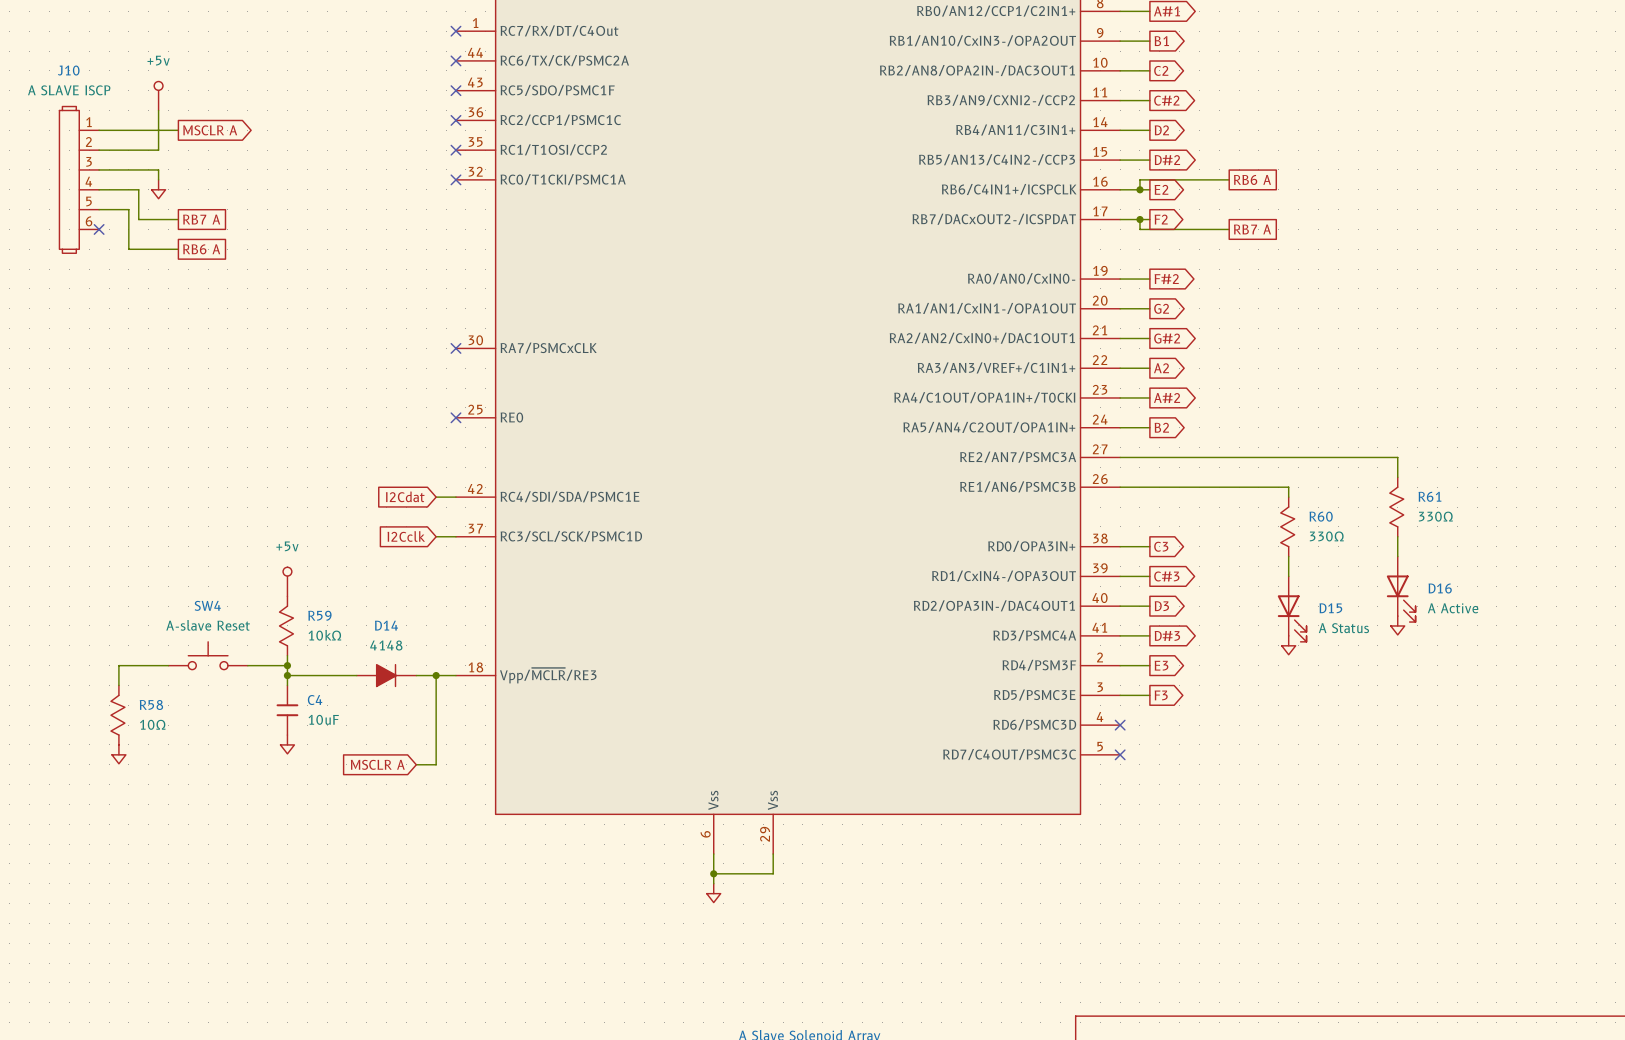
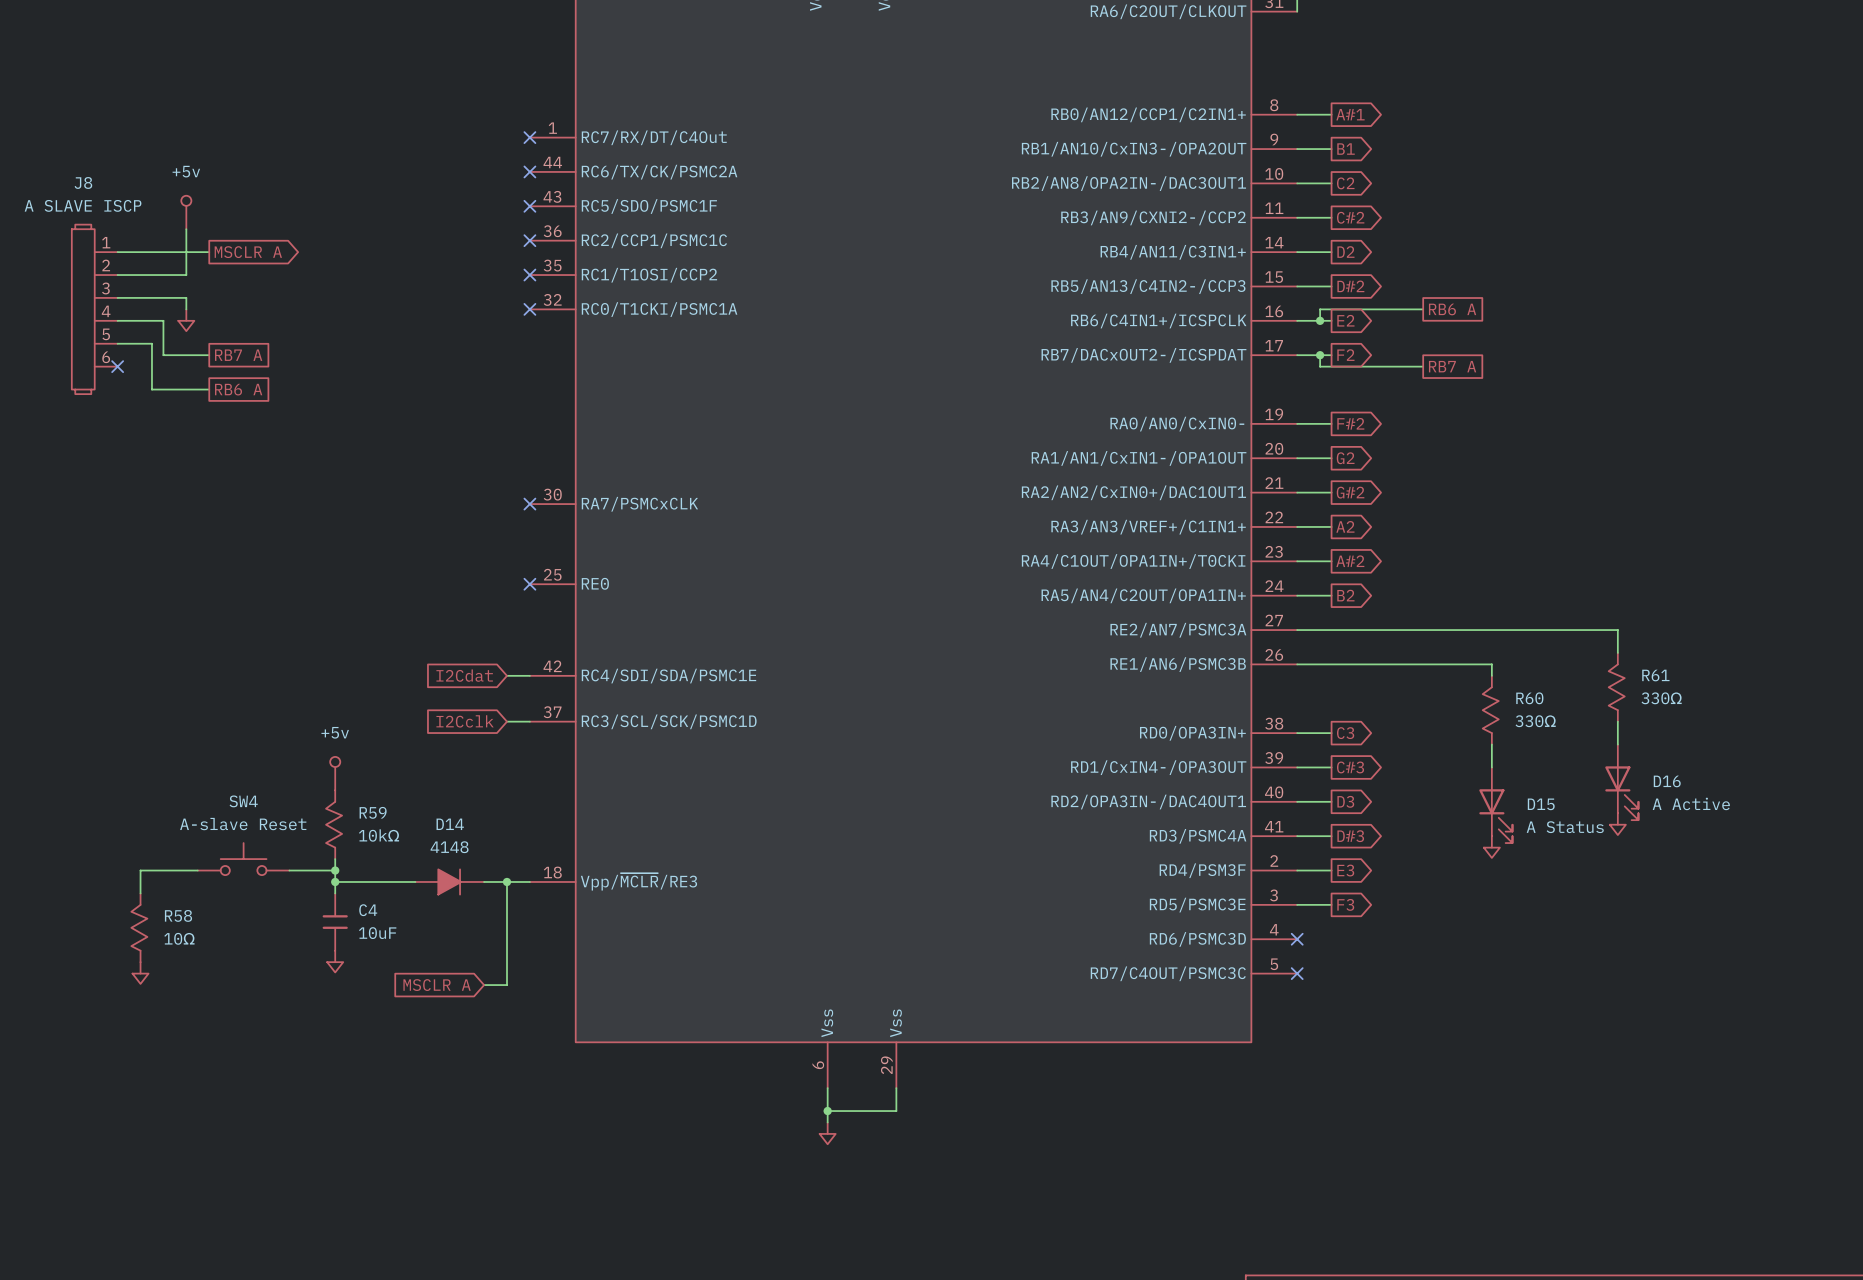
J10 name: J10 (68, 70) -> J8 (83, 182)

